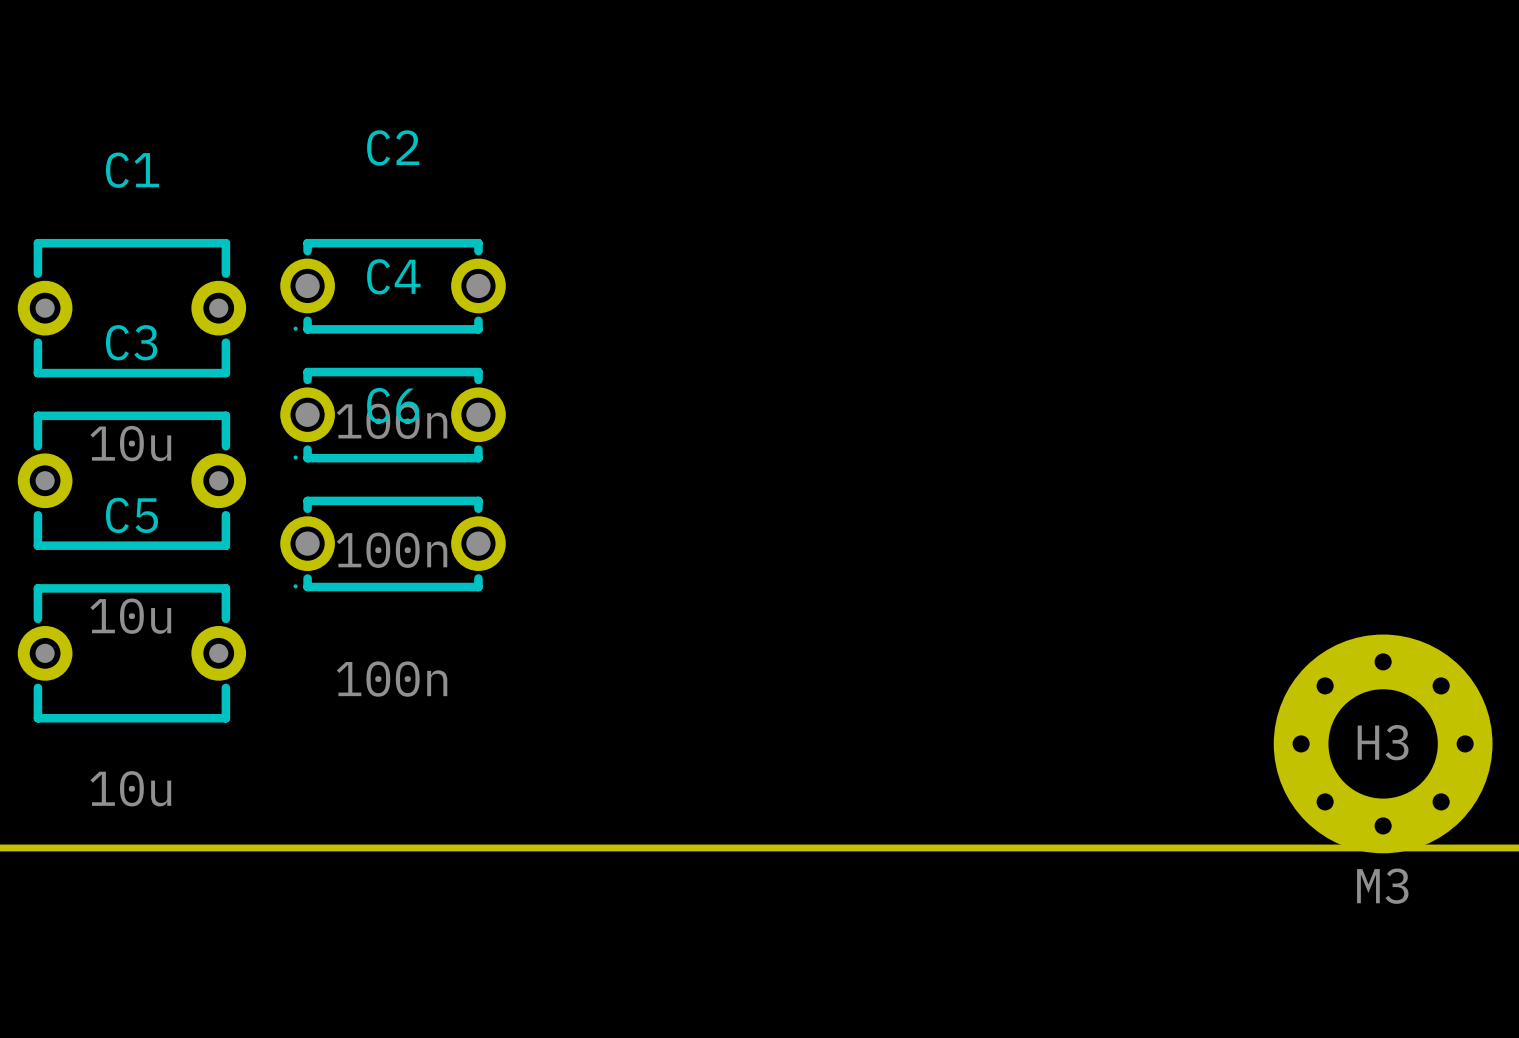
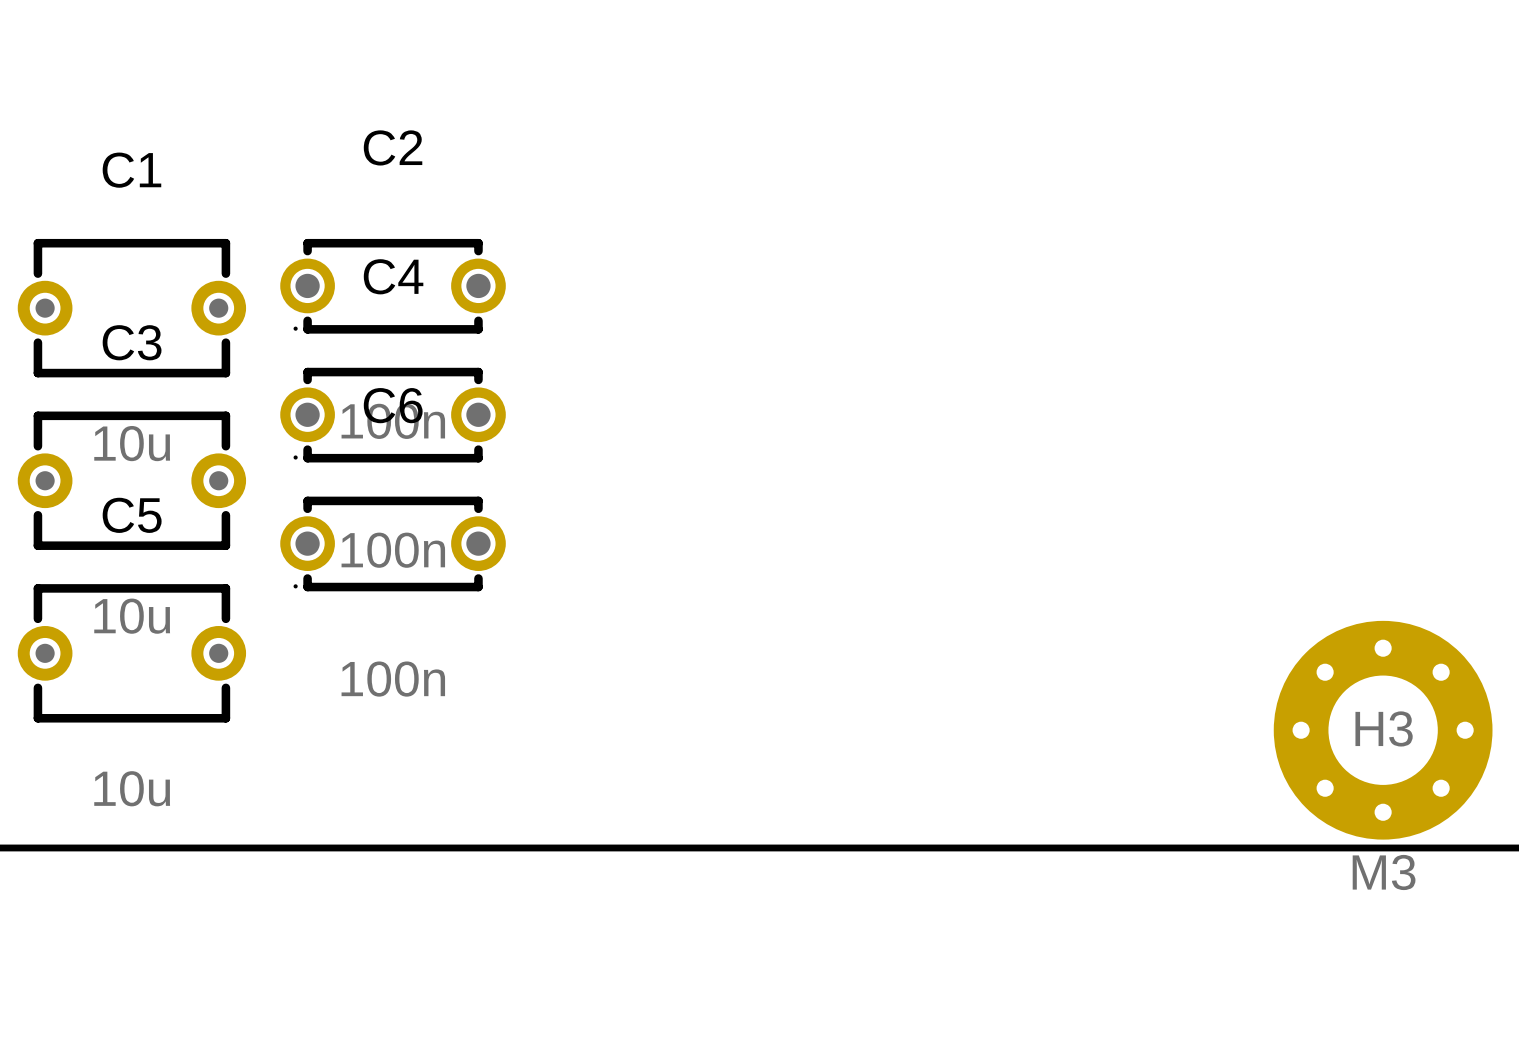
H3 position: (1383, 743) -> (1383, 730)

